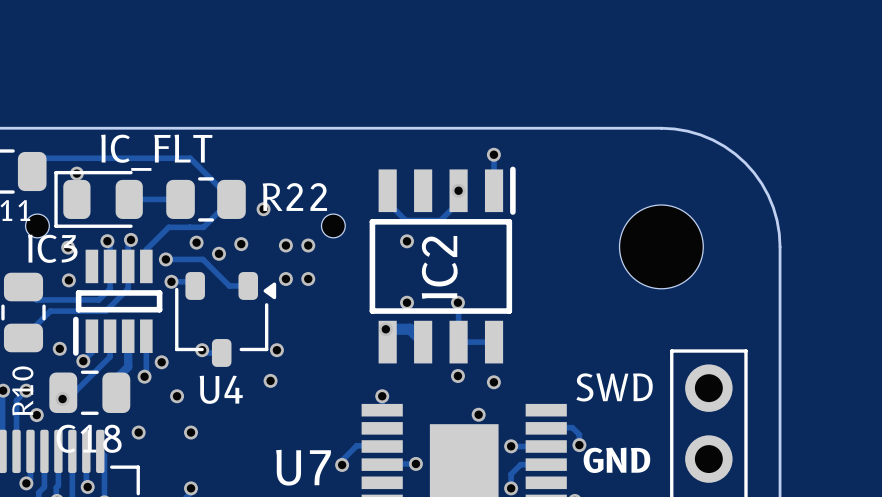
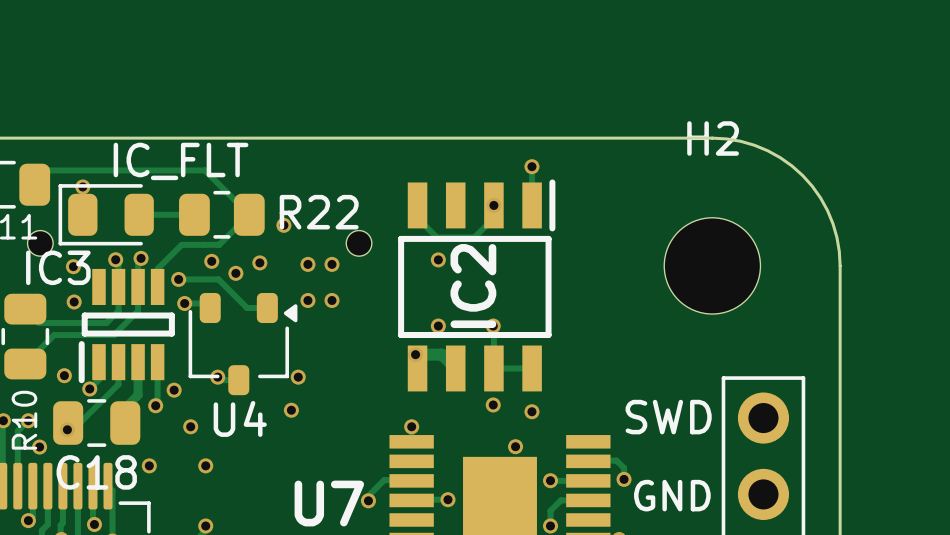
part: (661, 246) -> none
H2: none -> (712, 265)

